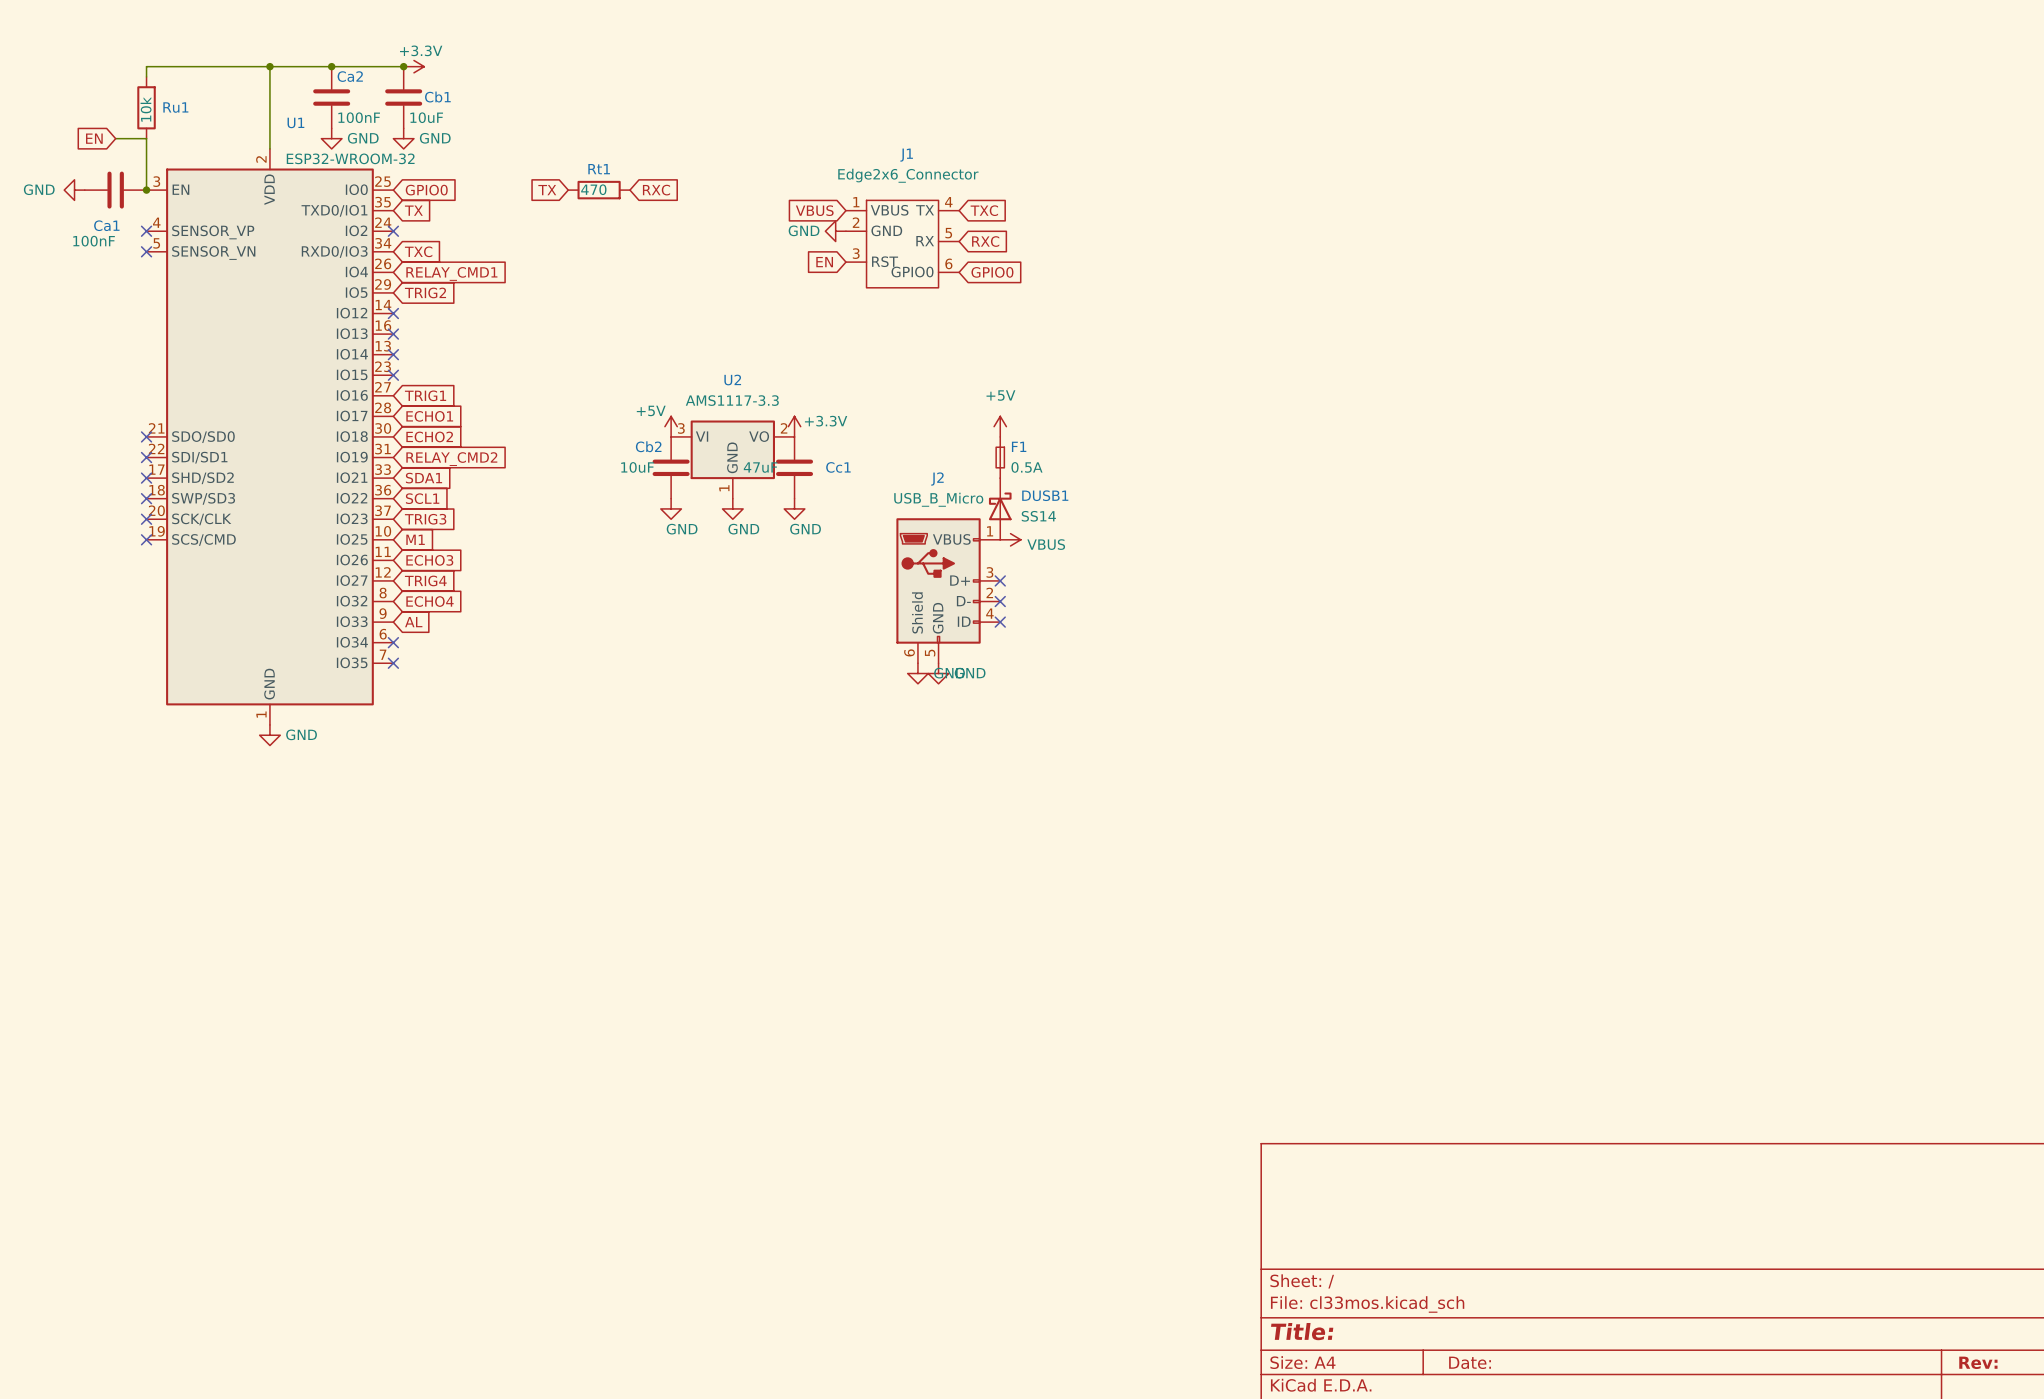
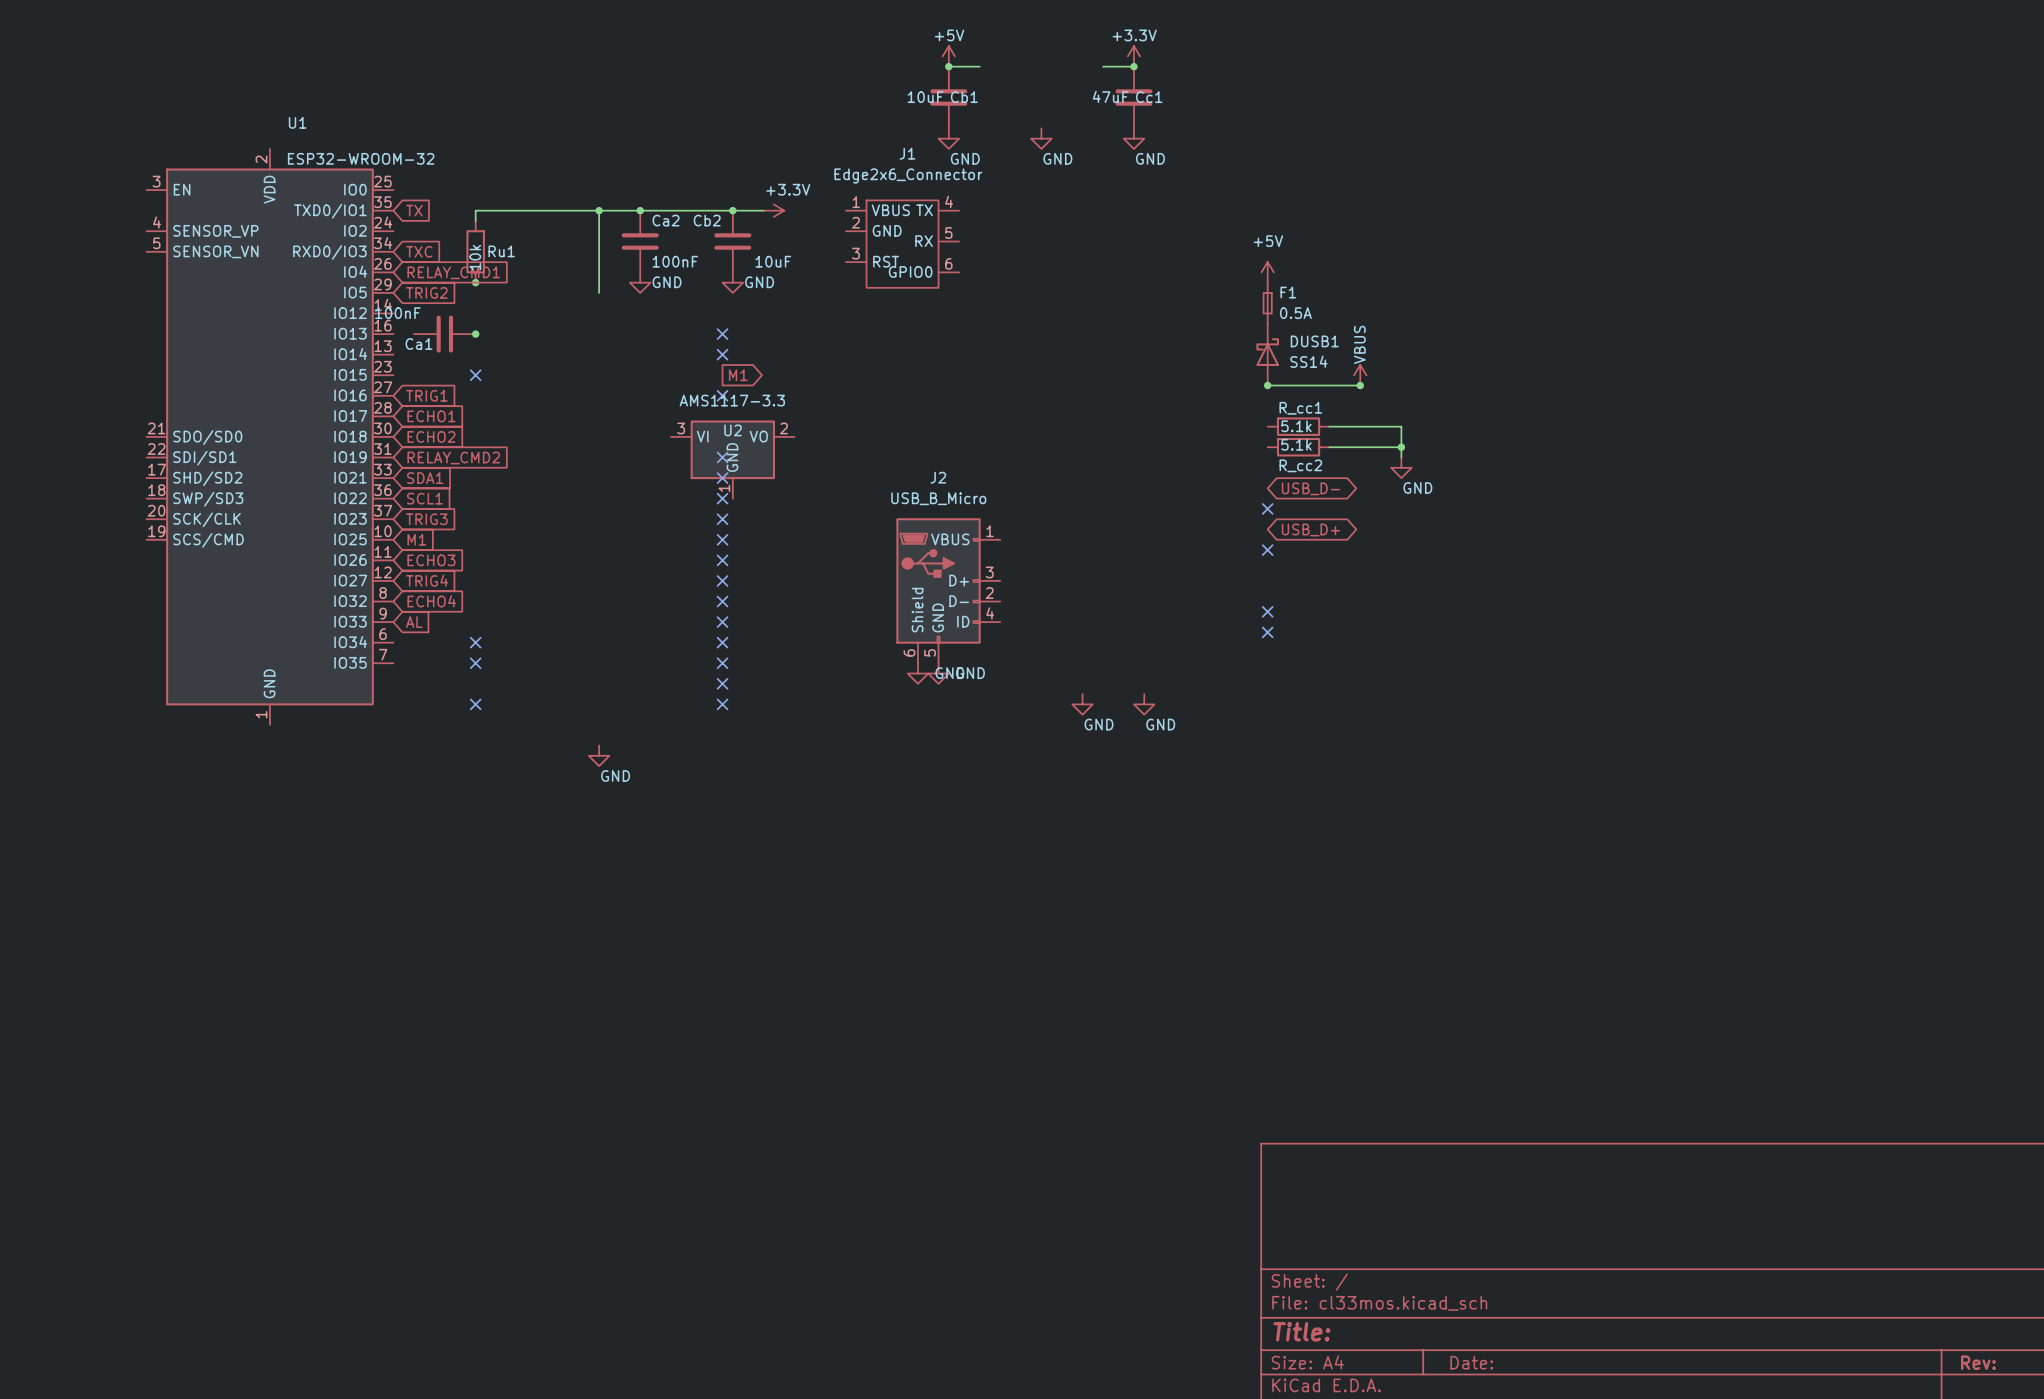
power symbol: none -> +5V (948, 56)
power symbol: none -> +3.3V (1133, 56)
wire: (269, 66) (269, 148) -> none
junction: (269, 66) -> none
junction: (331, 66) -> none
wire: (403, 66) (146, 66) (146, 76) -> none
junction: (403, 66) -> none
power symbol: +3.3V (413, 66) -> none
wire: none -> (948, 66) (979, 66)
junction: none -> (948, 66)
wire: none -> (1103, 66) (1133, 66)
junction: none -> (1133, 66)
Ca2 name position: Ca2 (350, 76) -> Ca2 (666, 220)
Ca2 position: (331, 97) -> (640, 241)
Cb1 position: (403, 97) -> (948, 97)
Cb1 name position: Cb1 (437, 97) -> Cb1 (964, 97)
Ru1 position: (146, 107) -> (475, 251)
Ru1 name position: Ru1 (175, 107) -> Ru1 (501, 251)
Ru1 value position: 10k (146, 109) -> 10k (475, 257)
Ca2 value position: 100nF (359, 117) -> 100nF (675, 261)
Cb1 value position: 10uF (426, 117) -> 10uF (925, 97)
global label: EN (94, 138) -> none
wire: (115, 138) (146, 138) (146, 190) -> none
power symbol: GND (331, 138) -> none
power symbol: GND (403, 138) -> none
power symbol: none -> GND (948, 138)
power symbol: none -> GND (1041, 138)
power symbol: none -> GND (1133, 138)
power symbol: GND (74, 190) -> none
Ca1 position: (115, 190) -> (444, 334)
junction: (146, 190) -> none
global label: GPIO0 (426, 190) -> none
global label: TX (547, 190) -> none
Rt1: 470 (599, 190) -> none
global label: RXC (656, 190) -> none
wire: none -> (599, 210) (599, 292)
junction: none -> (599, 210)
junction: none -> (640, 210)
junction: none -> (732, 210)
wire: none -> (763, 210) (475, 210) (475, 220)
power symbol: none -> +3.3V (773, 210)
global label: VBUS (814, 210) -> none
global label: TXC (984, 210) -> none
Ca1 name position: Ca1 (106, 225) -> Ca1 (419, 343)
no-connect mark: (146, 231) -> none
no-connect mark: (393, 231) -> none
power symbol: GND (835, 231) -> none
Ca1 value position: 100nF (94, 241) -> 100nF (397, 313)
global label: RXC (985, 241) -> none
no-connect mark: (146, 251) -> none
global label: EN (824, 262) -> none
global label: GPIO0 (992, 272) -> none
power symbol: none -> +5V (1267, 272)
junction: none -> (475, 282)
power symbol: none -> GND (640, 282)
power symbol: none -> GND (732, 282)
no-connect mark: (393, 313) -> none
no-connect mark: (393, 334) -> none
junction: none -> (475, 334)
no-connect mark: none -> (722, 334)
no-connect mark: (393, 354) -> none
no-connect mark: none -> (722, 354)
no-connect mark: (393, 375) -> none
no-connect mark: none -> (475, 375)
global label: none -> M1 (738, 375)
power symbol: none -> VBUS (1360, 375)
U2 name position: U2 (732, 380) -> U2 (733, 430)
wire: none -> (1267, 385) (1360, 385)
junction: none -> (1267, 385)
junction: none -> (1360, 385)
no-connect mark: none -> (722, 395)
power symbol: +5V (671, 426) -> none
power symbol: +3.3V (794, 426) -> none
power symbol: +5V (1000, 426) -> none
R_cc1: none -> 5.1k (1298, 426)
wire: none -> (1329, 426) (1401, 426) (1401, 457)
no-connect mark: (146, 436) -> none
Cb2 name position: Cb2 (648, 446) -> Cb2 (707, 220)
R_cc2: none -> 5.1k (1298, 447)
wire: none -> (1329, 447) (1401, 447)
junction: none -> (1401, 447)
no-connect mark: (146, 457) -> none
no-connect mark: none -> (722, 457)
F1 position: (1000, 457) -> (1267, 303)
Cb2 value position: 10uF (637, 467) -> 10uF (773, 261)
Cb2 position: (671, 467) -> (732, 241)
Cc1 value position: 47uF (760, 467) -> 47uF (1110, 96)
Cc1 position: (794, 467) -> (1133, 97)
Cc1 name position: Cc1 (838, 467) -> Cc1 (1149, 97)
power symbol: none -> GND (1401, 467)
no-connect mark: (146, 478) -> none
no-connect mark: none -> (722, 478)
global label: none -> USB_D- (1310, 488)
no-connect mark: (146, 498) -> none
no-connect mark: none -> (722, 498)
power symbol: GND (671, 508) -> none
power symbol: GND (732, 508) -> none
power symbol: GND (794, 508) -> none
DUSB1 position: (1000, 508) -> (1267, 354)
no-connect mark: none -> (1267, 508)
no-connect mark: (146, 519) -> none
no-connect mark: none -> (722, 519)
global label: none -> USB_D+ (1310, 530)
no-connect mark: (146, 539) -> none
no-connect mark: none -> (722, 539)
power symbol: VBUS (1010, 539) -> none
no-connect mark: none -> (1267, 550)
no-connect mark: none -> (722, 560)
no-connect mark: none -> (722, 580)
no-connect mark: (1000, 580) -> none
no-connect mark: none -> (722, 601)
no-connect mark: (1000, 601) -> none
no-connect mark: none -> (1267, 611)
no-connect mark: none -> (722, 622)
no-connect mark: (1000, 622) -> none
no-connect mark: none -> (1267, 632)
no-connect mark: (393, 642) -> none
no-connect mark: none -> (475, 642)
no-connect mark: none -> (722, 642)
no-connect mark: (393, 663) -> none
no-connect mark: none -> (475, 663)
no-connect mark: none -> (722, 663)
no-connect mark: none -> (722, 683)
no-connect mark: none -> (475, 704)
no-connect mark: none -> (722, 704)
power symbol: none -> GND (1082, 704)
power symbol: none -> GND (1144, 704)
power symbol: GND (269, 735) -> none
power symbol: none -> GND (599, 755)

